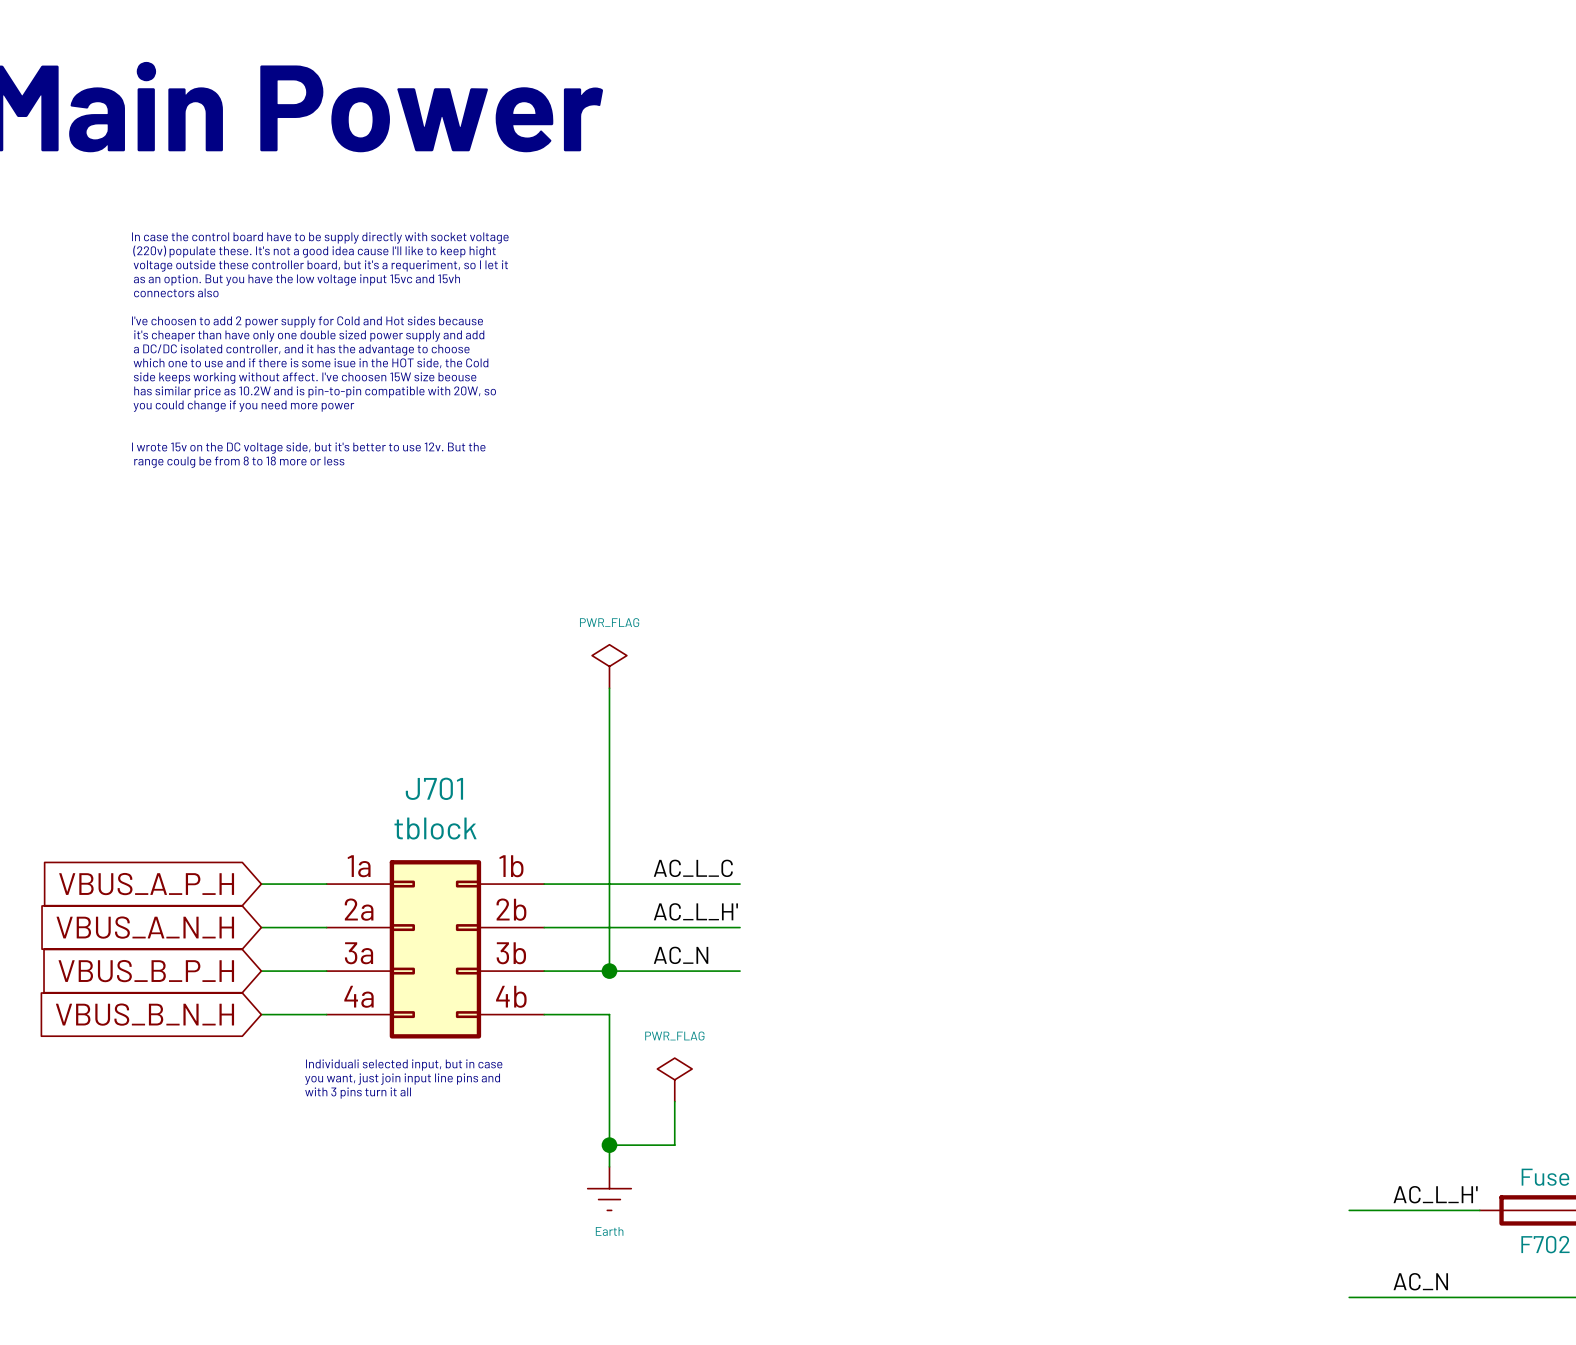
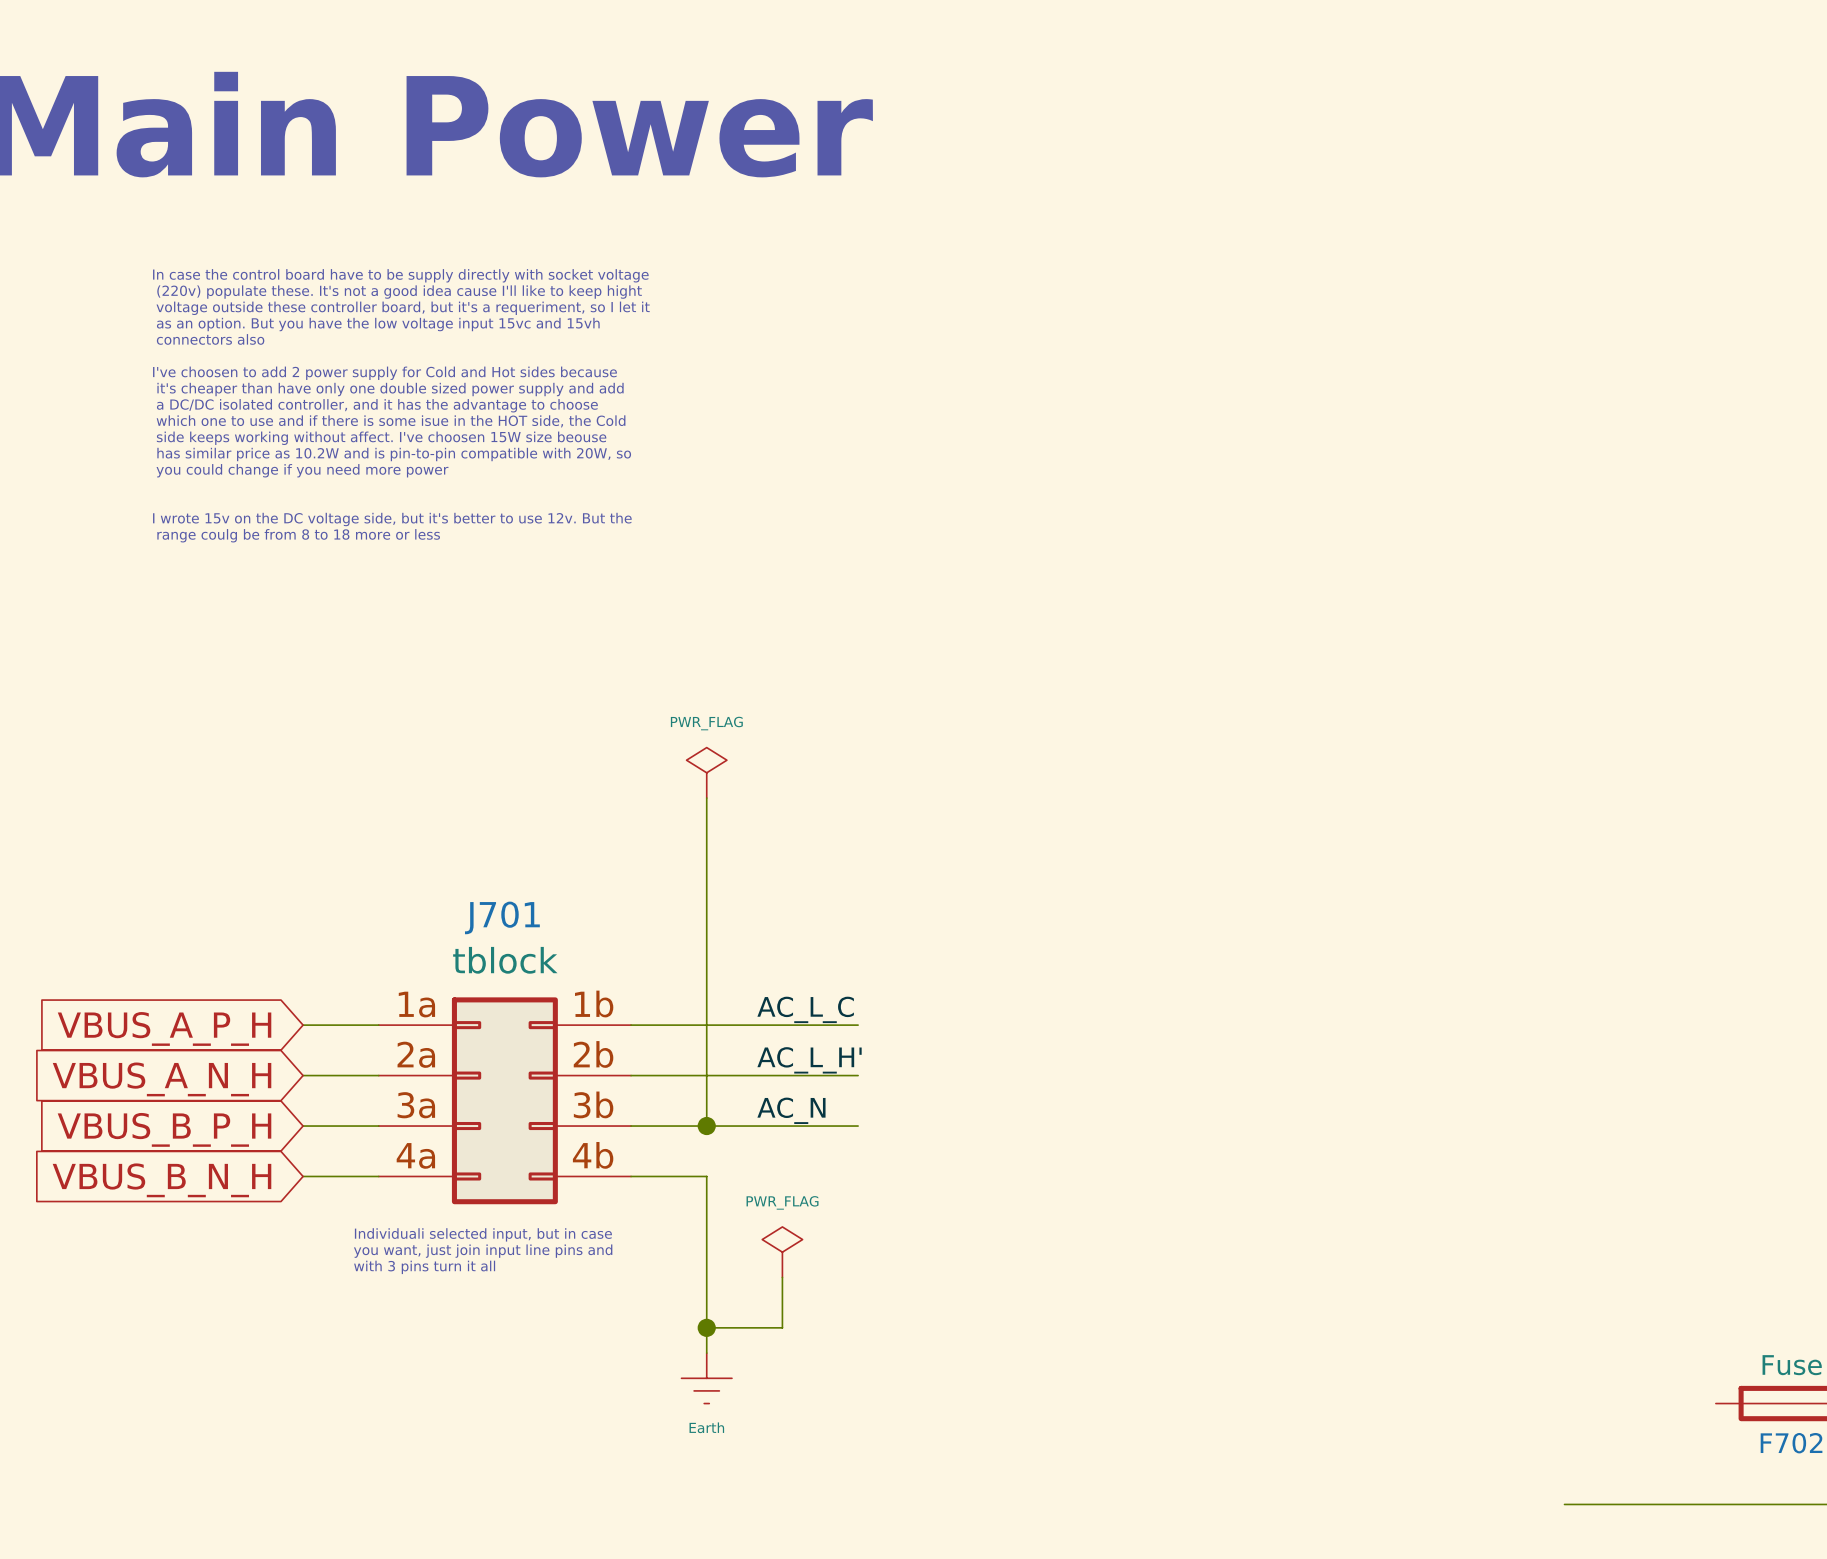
label: AC_L_H' (1435, 1194) -> none
wire: (1349, 1210) (1479, 1210) -> none
label: AC_N (1420, 1281) -> none

